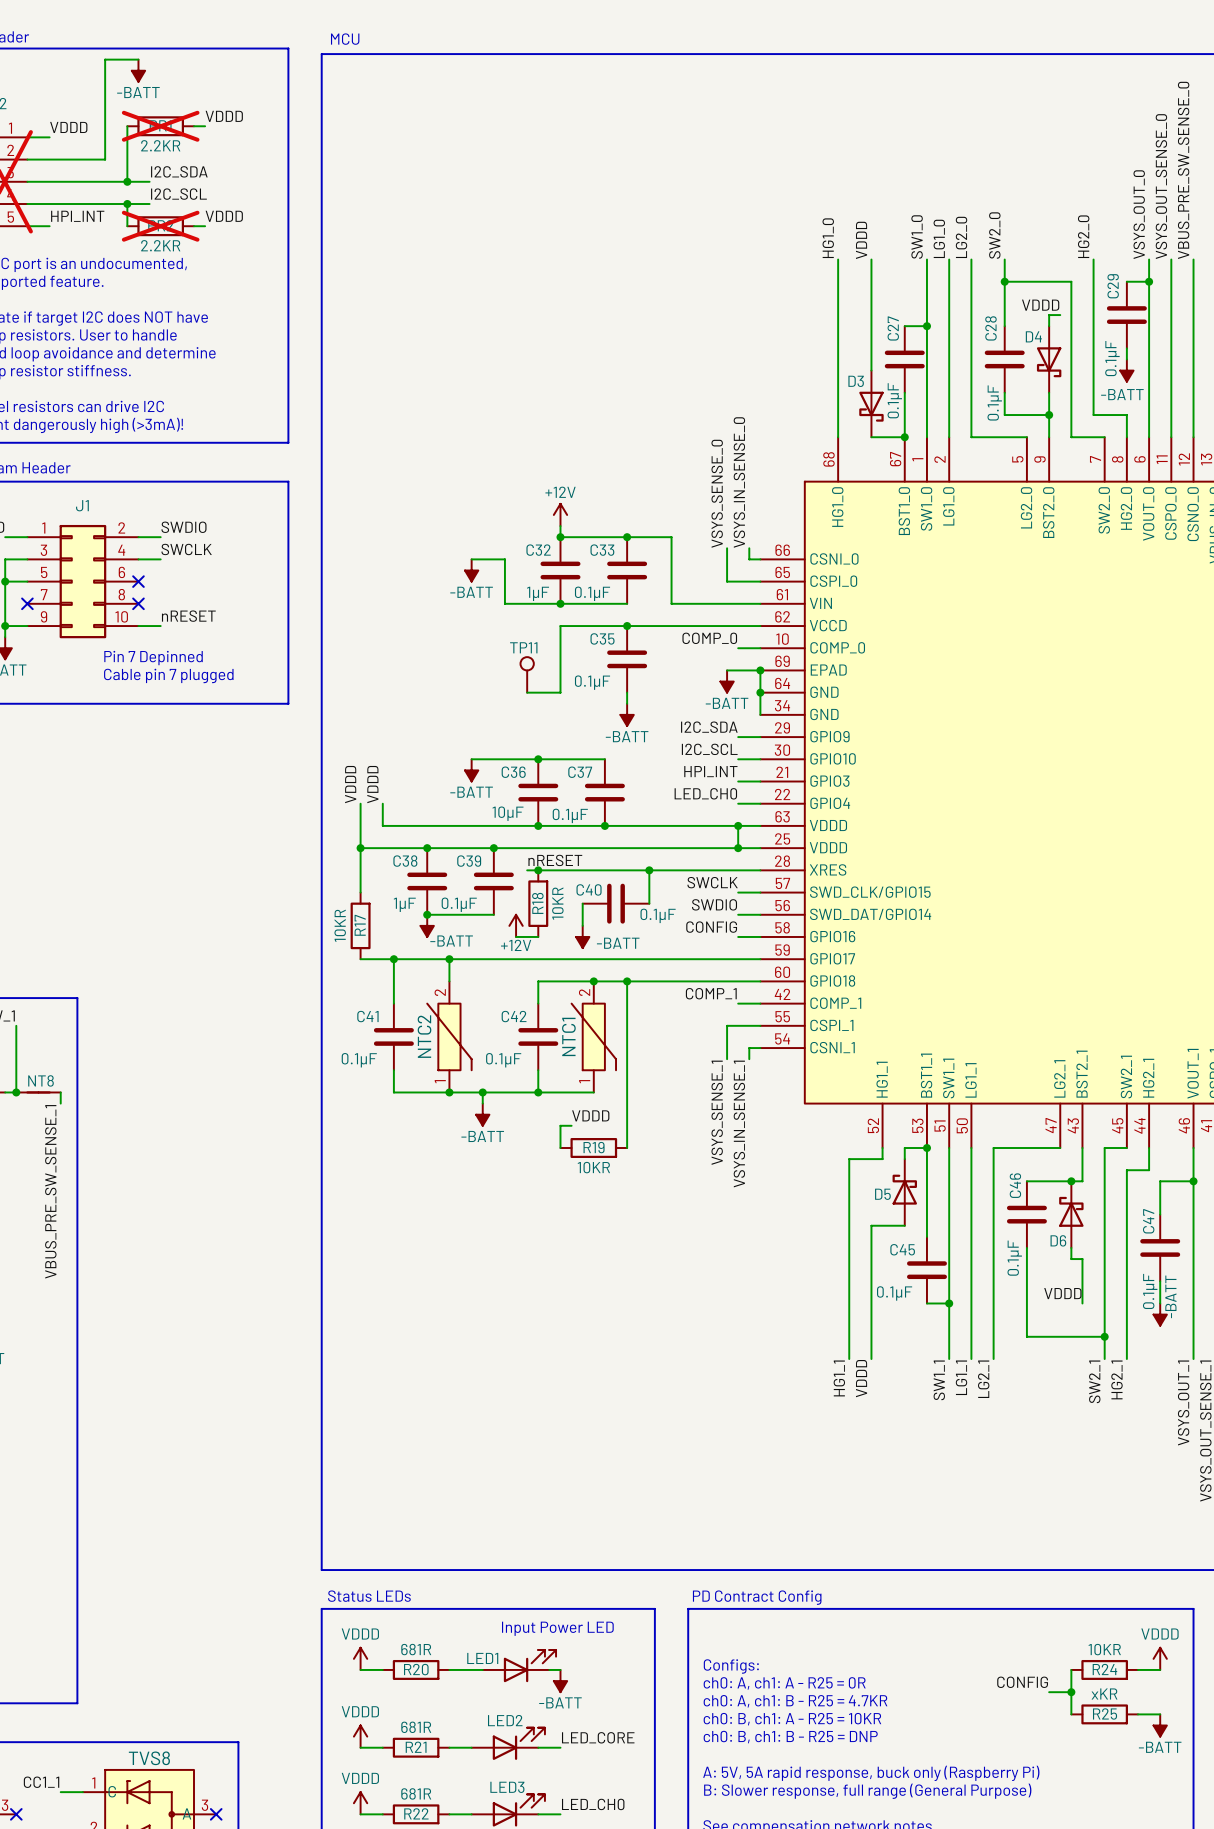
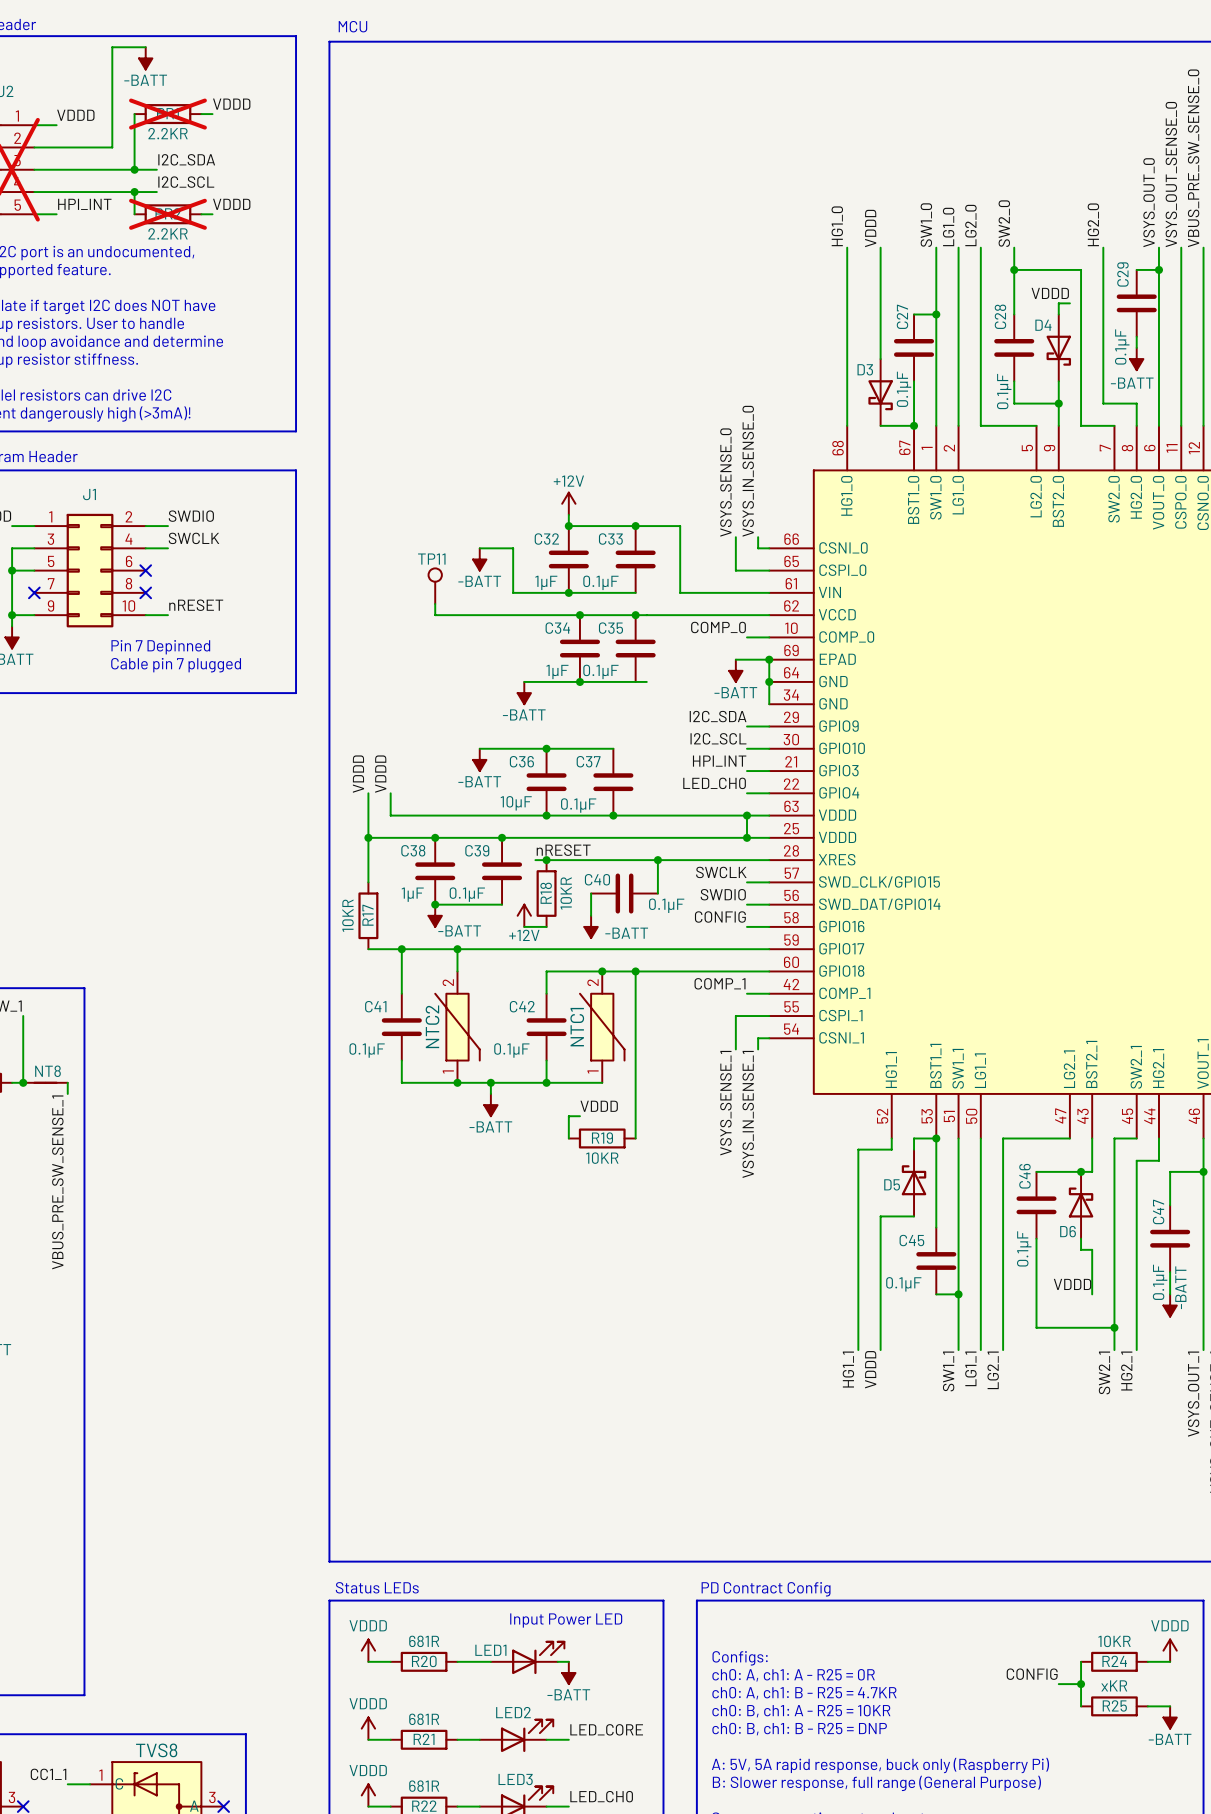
wire: none -> (435, 604) (435, 615) (568, 615)
wire: (560, 626) (560, 692) -> (646, 681) (568, 681)
junction: none -> (579, 615)
C34: none -> 1μF (579, 648)
TP11 position: (527, 674) -> (435, 586)
wire: none -> (524, 681) (535, 681)
junction: none -> (579, 681)
wire: (627, 692) (627, 703) -> none
power symbol position: -BATT (627, 714) -> -BATT (524, 693)

